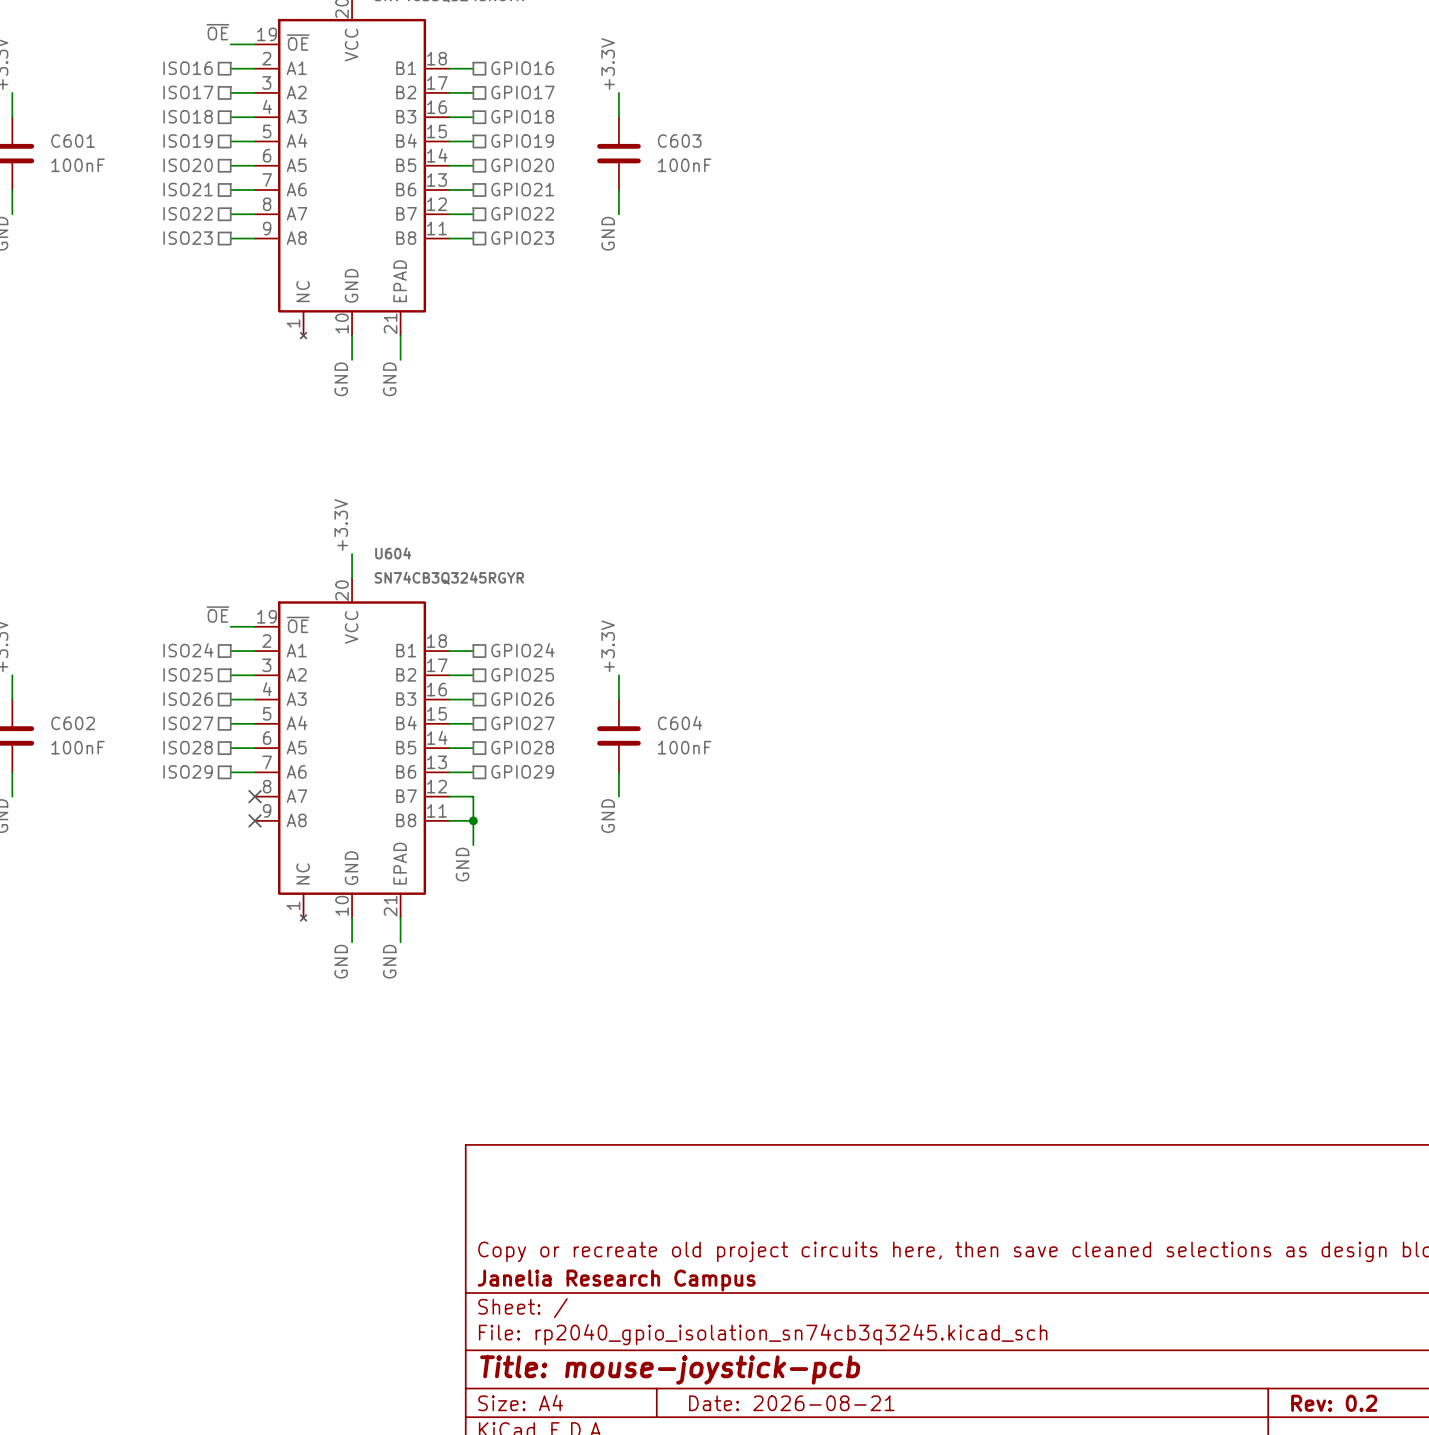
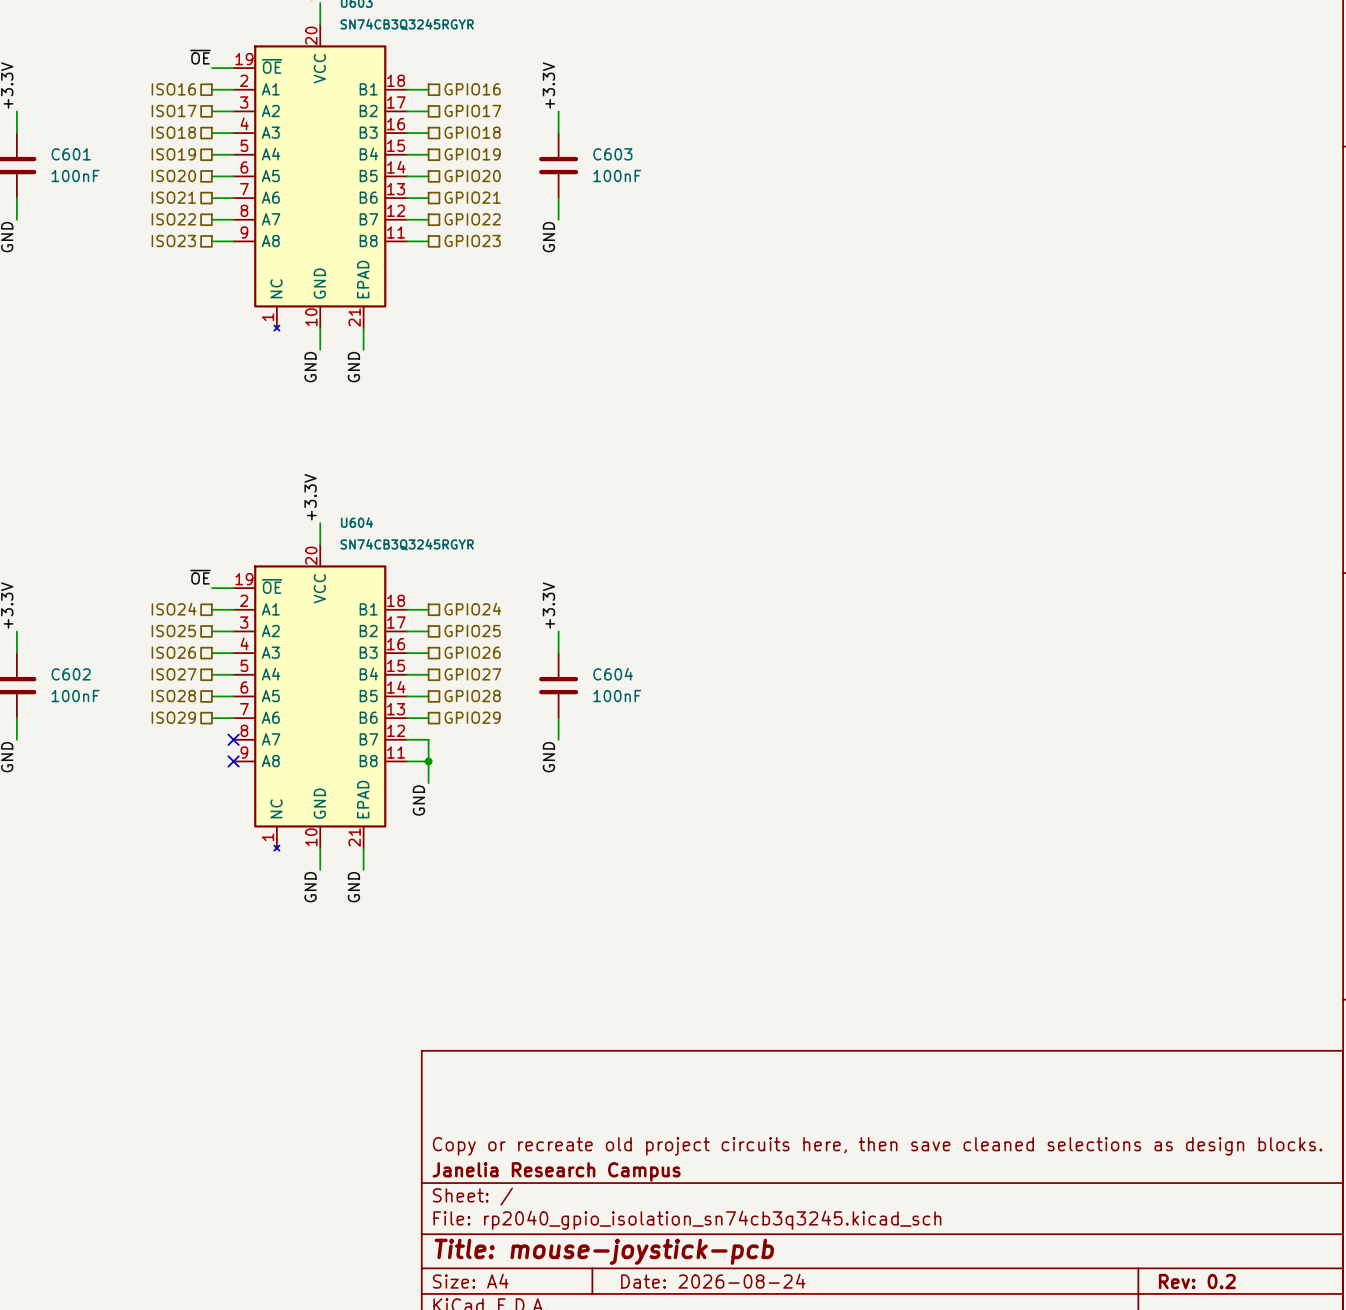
title block: Date: 2026-08-21 (791, 1403) -> Date: 2026-08-24 (713, 1281)

